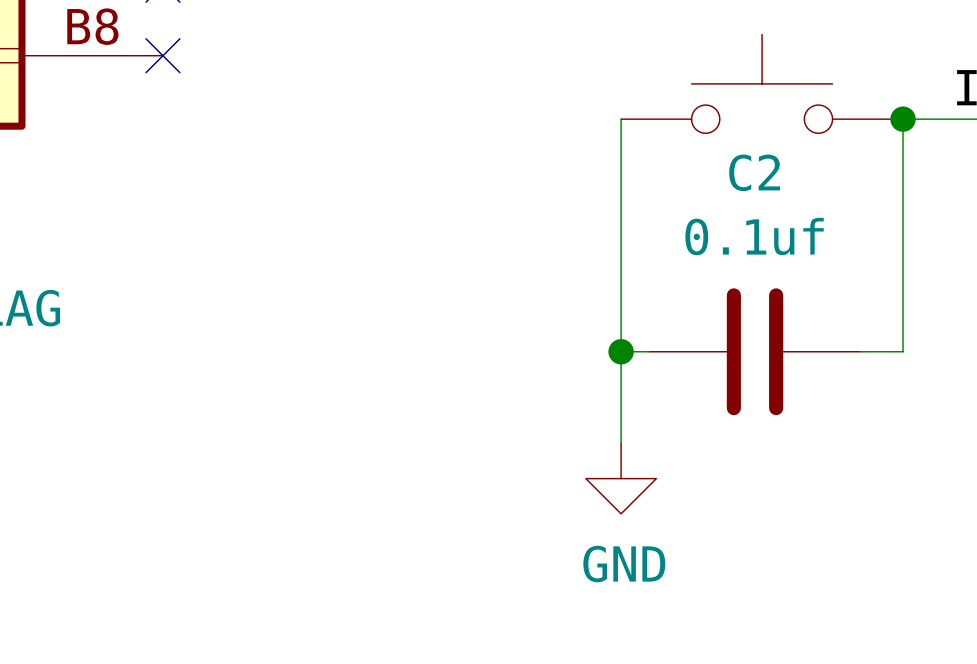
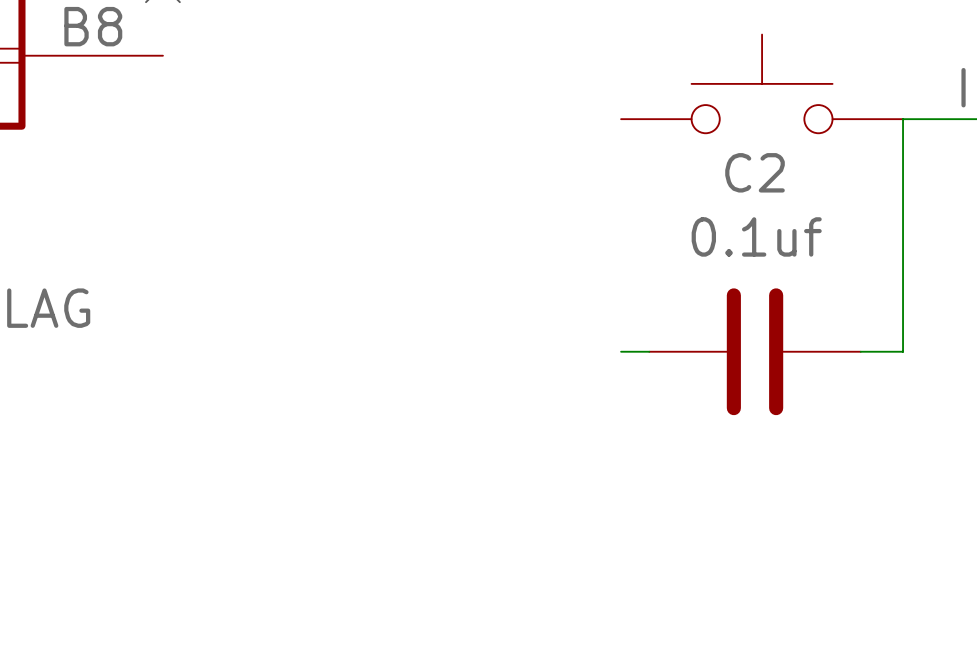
no-connect mark: (162, 55) -> none
wire: (621, 119) (621, 443) -> none
junction: (903, 119) -> none
junction: (621, 351) -> none
power symbol: GND (621, 478) -> none

